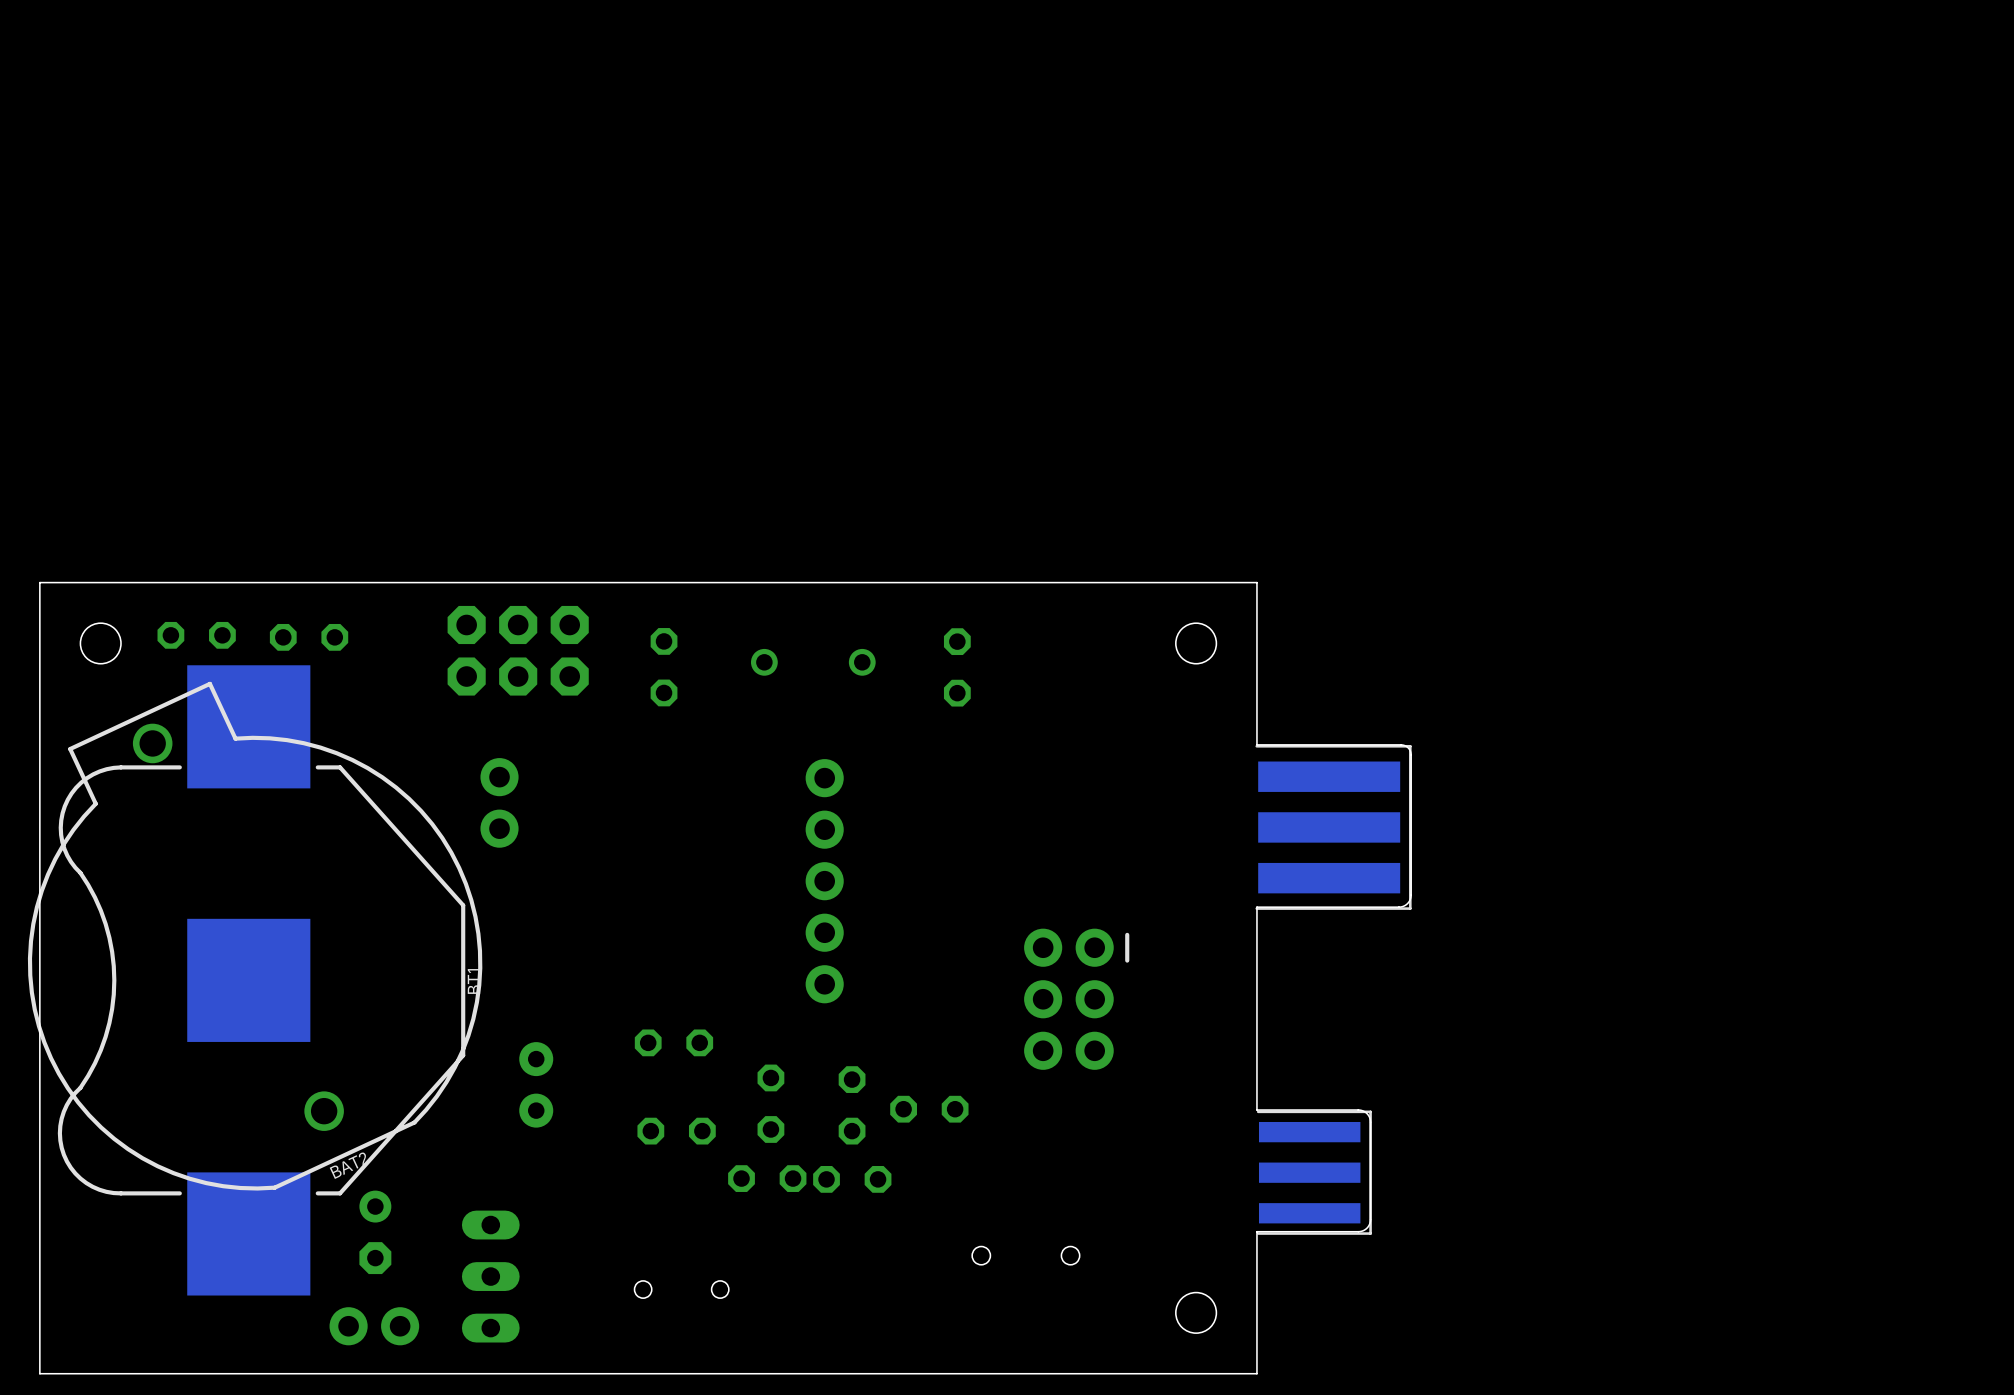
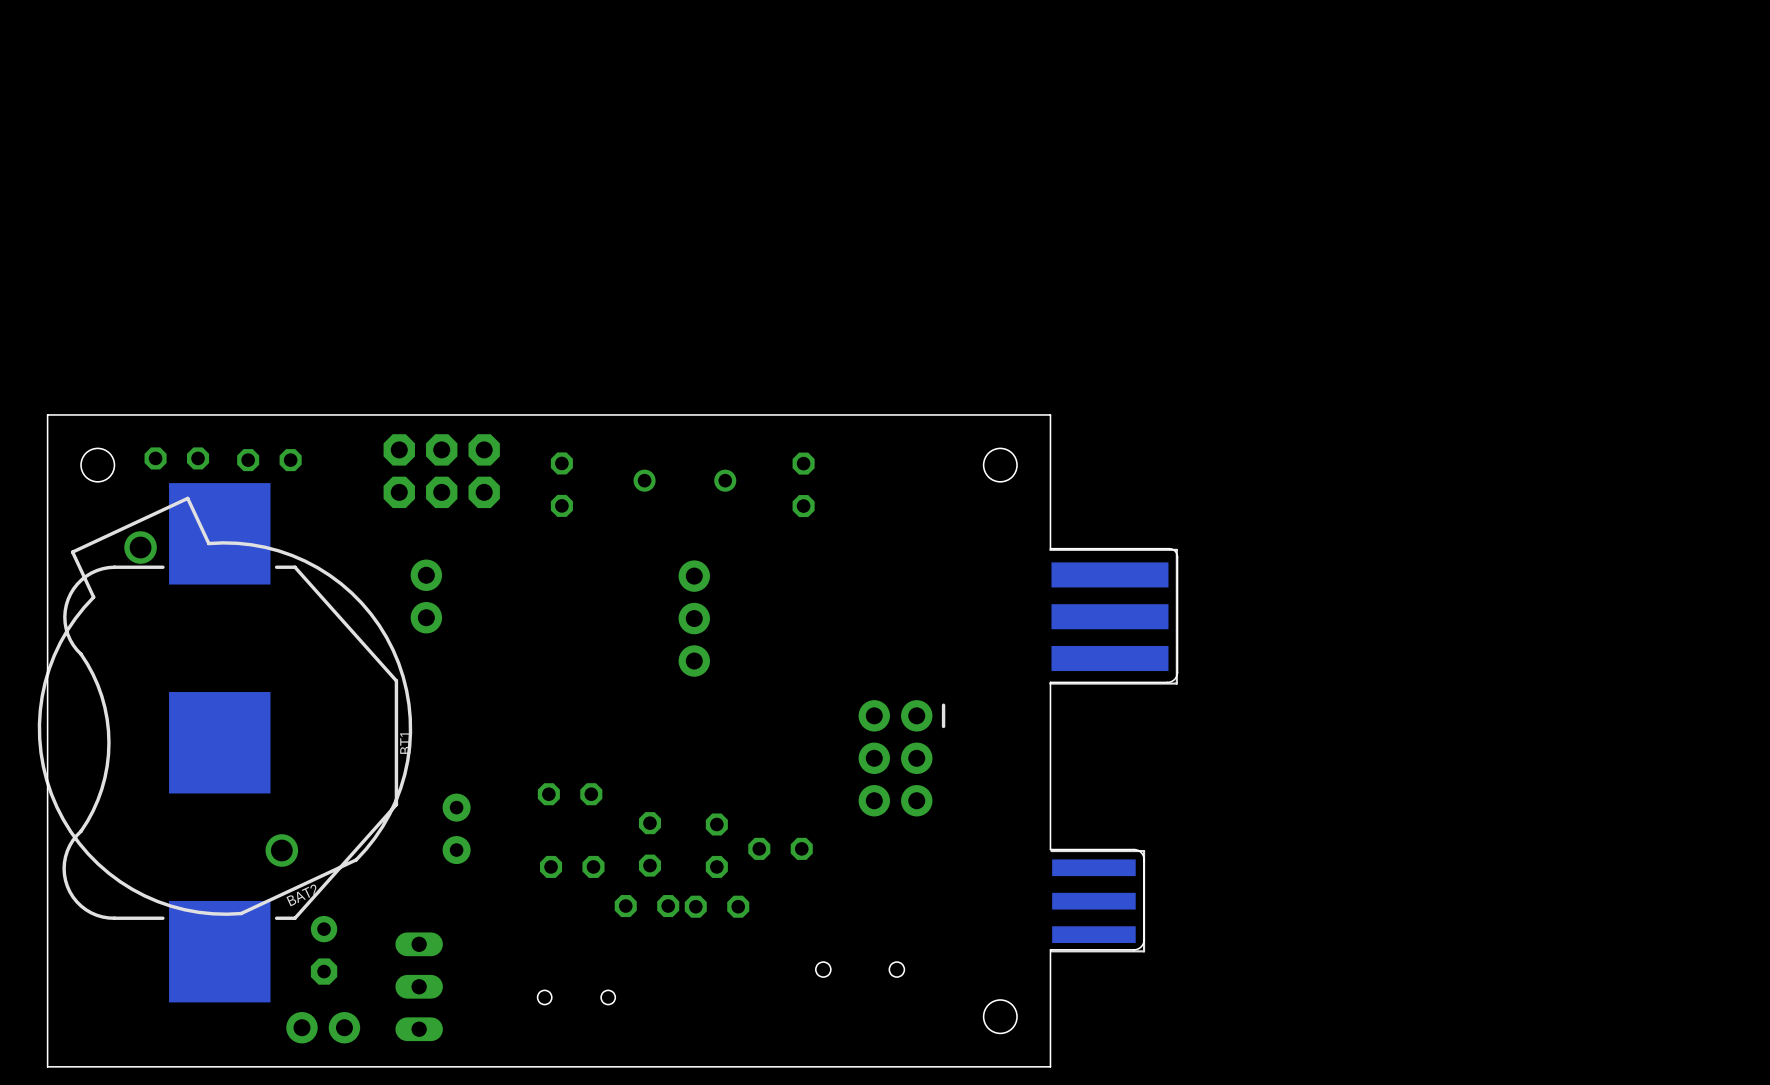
part: (824, 881) -> none

